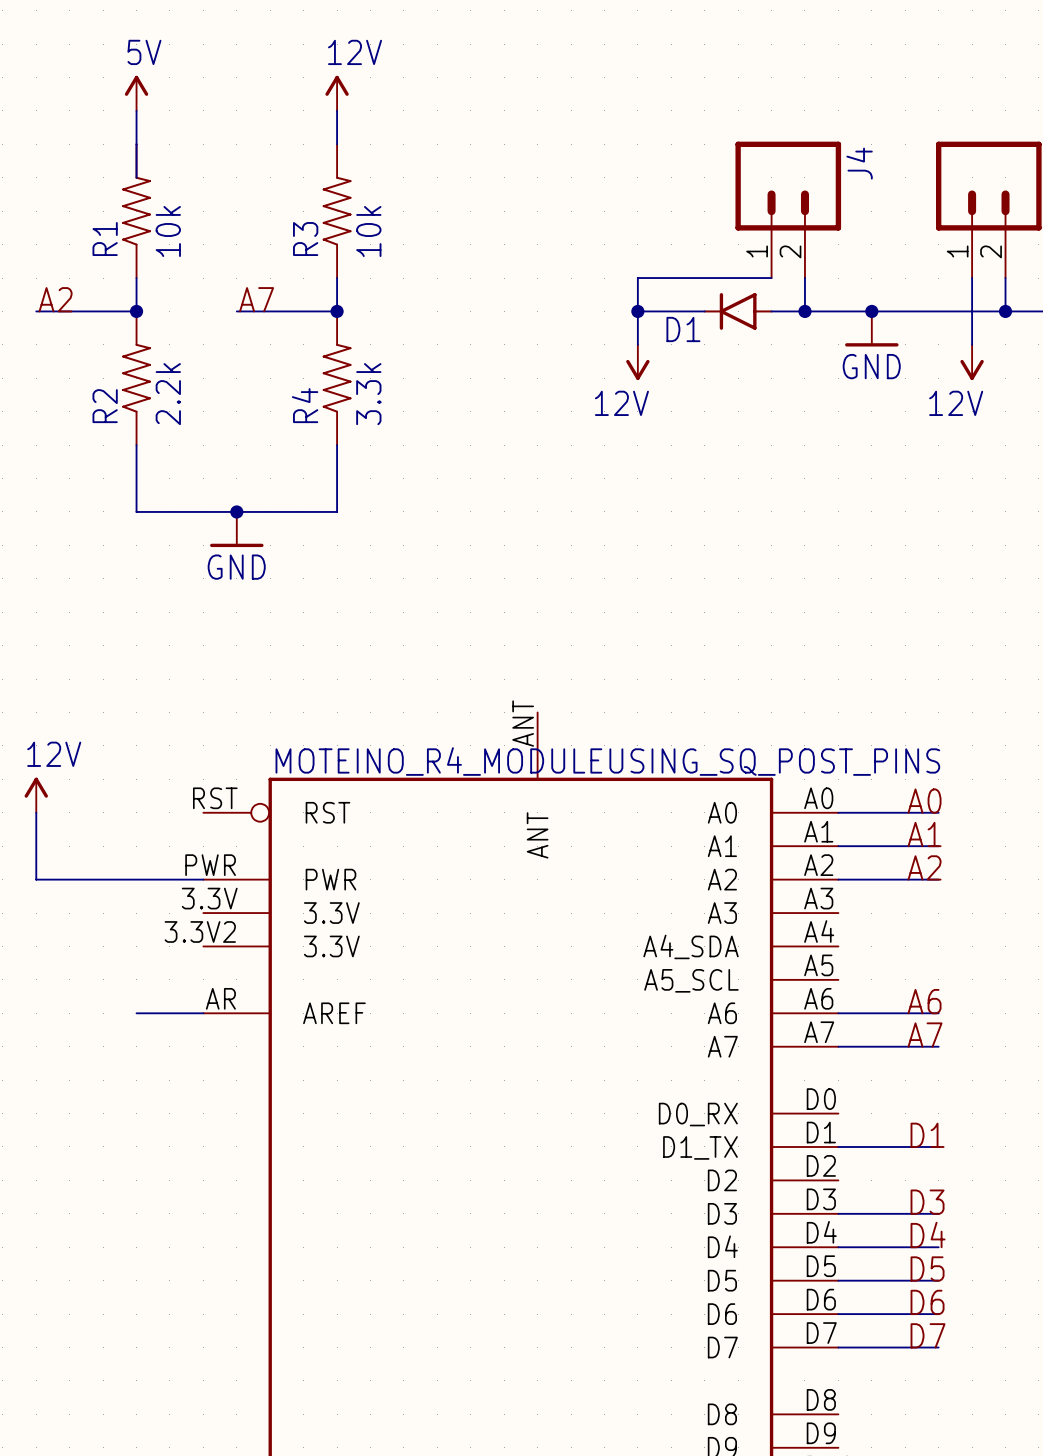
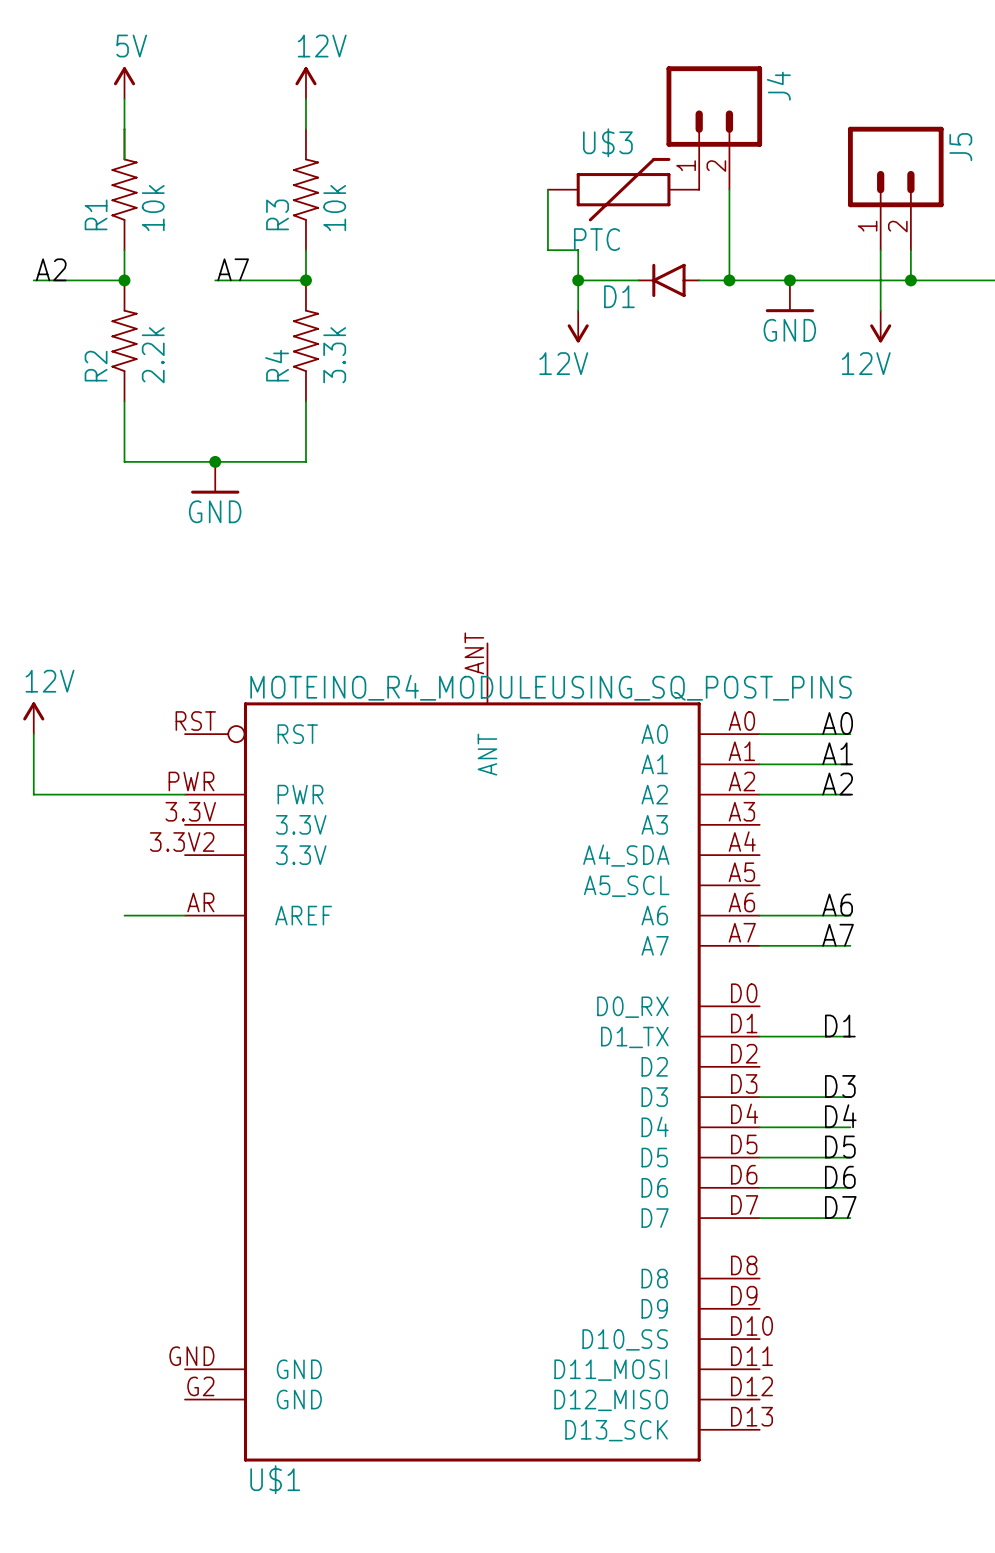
J4 position: (788, 209) -> (714, 127)
U$3: none -> PTC (623, 189)
wire: (637, 278) (771, 278) -> (578, 250) (547, 250) (547, 189)

